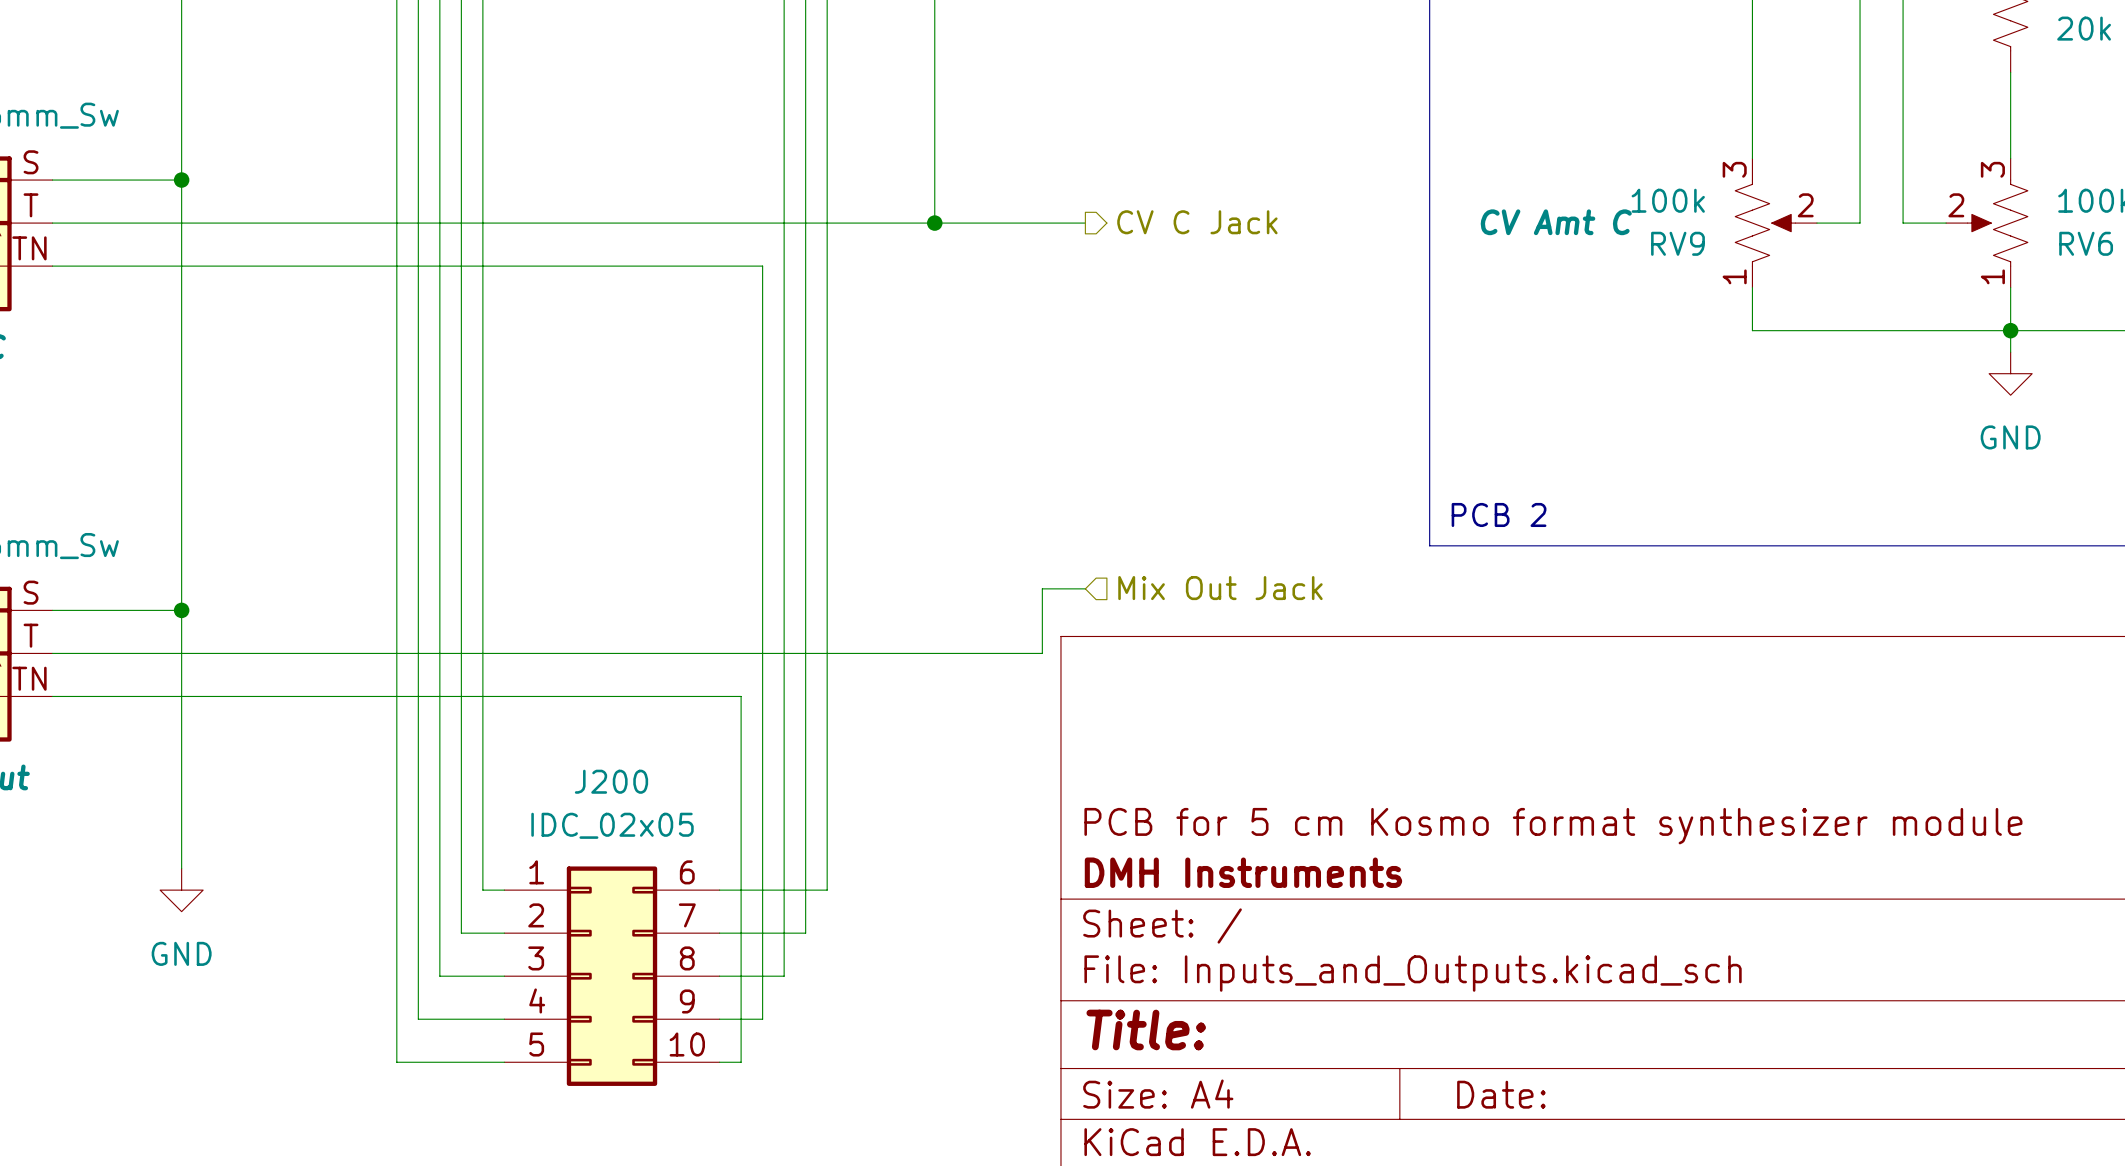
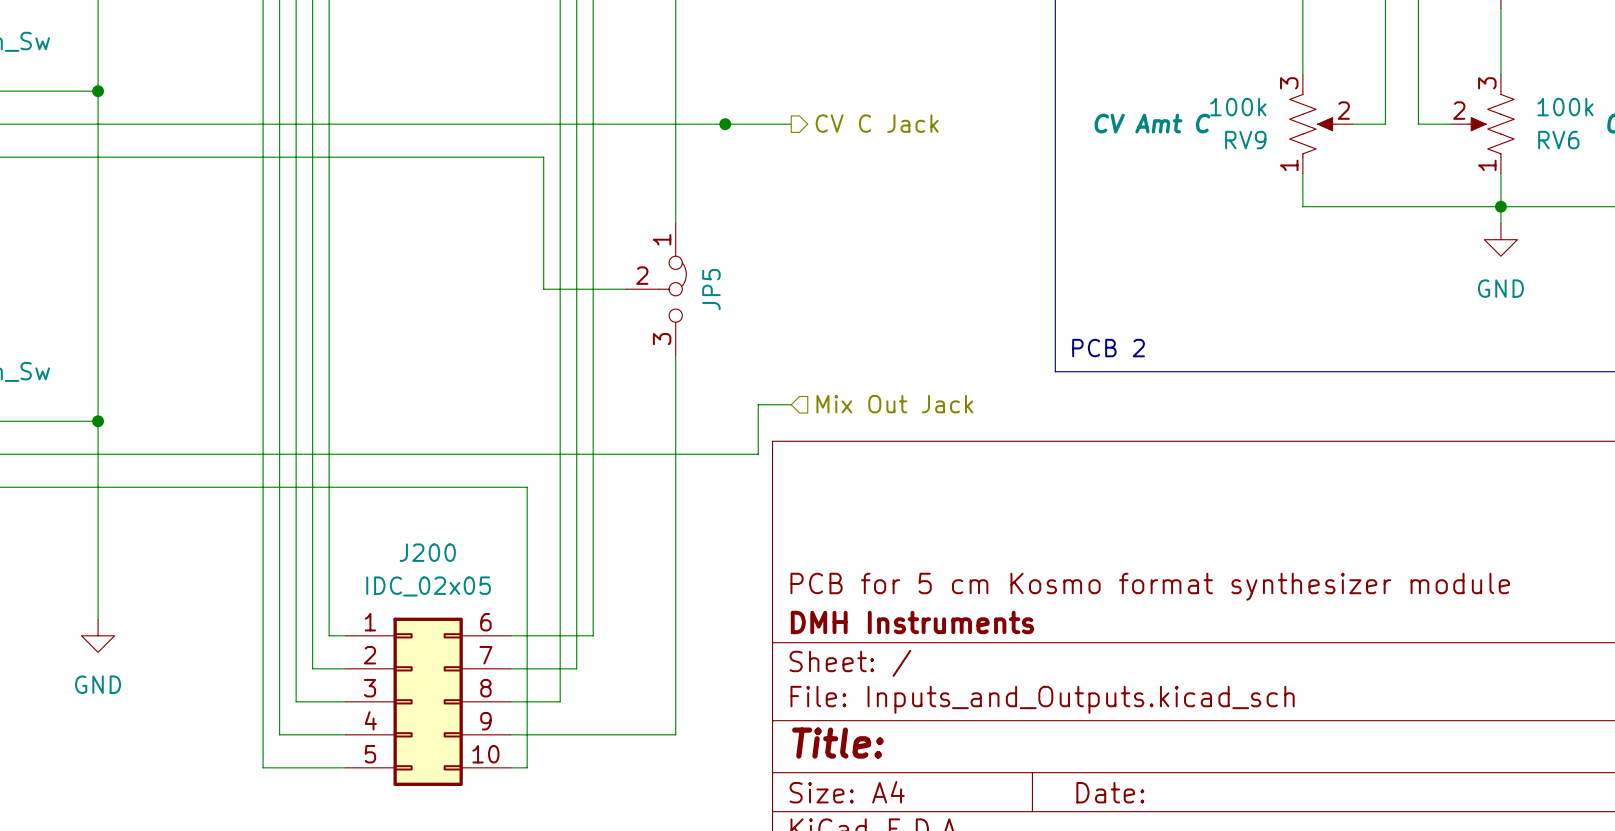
wire: none -> (675, 124) (675, 223)
junction position: (934, 223) -> (725, 124)
wire: (762, 438) (762, 1019) -> (675, 355) (675, 734) (543, 734)
wire: none -> (543, 289) (626, 289)
JP5: none -> (656, 289)

